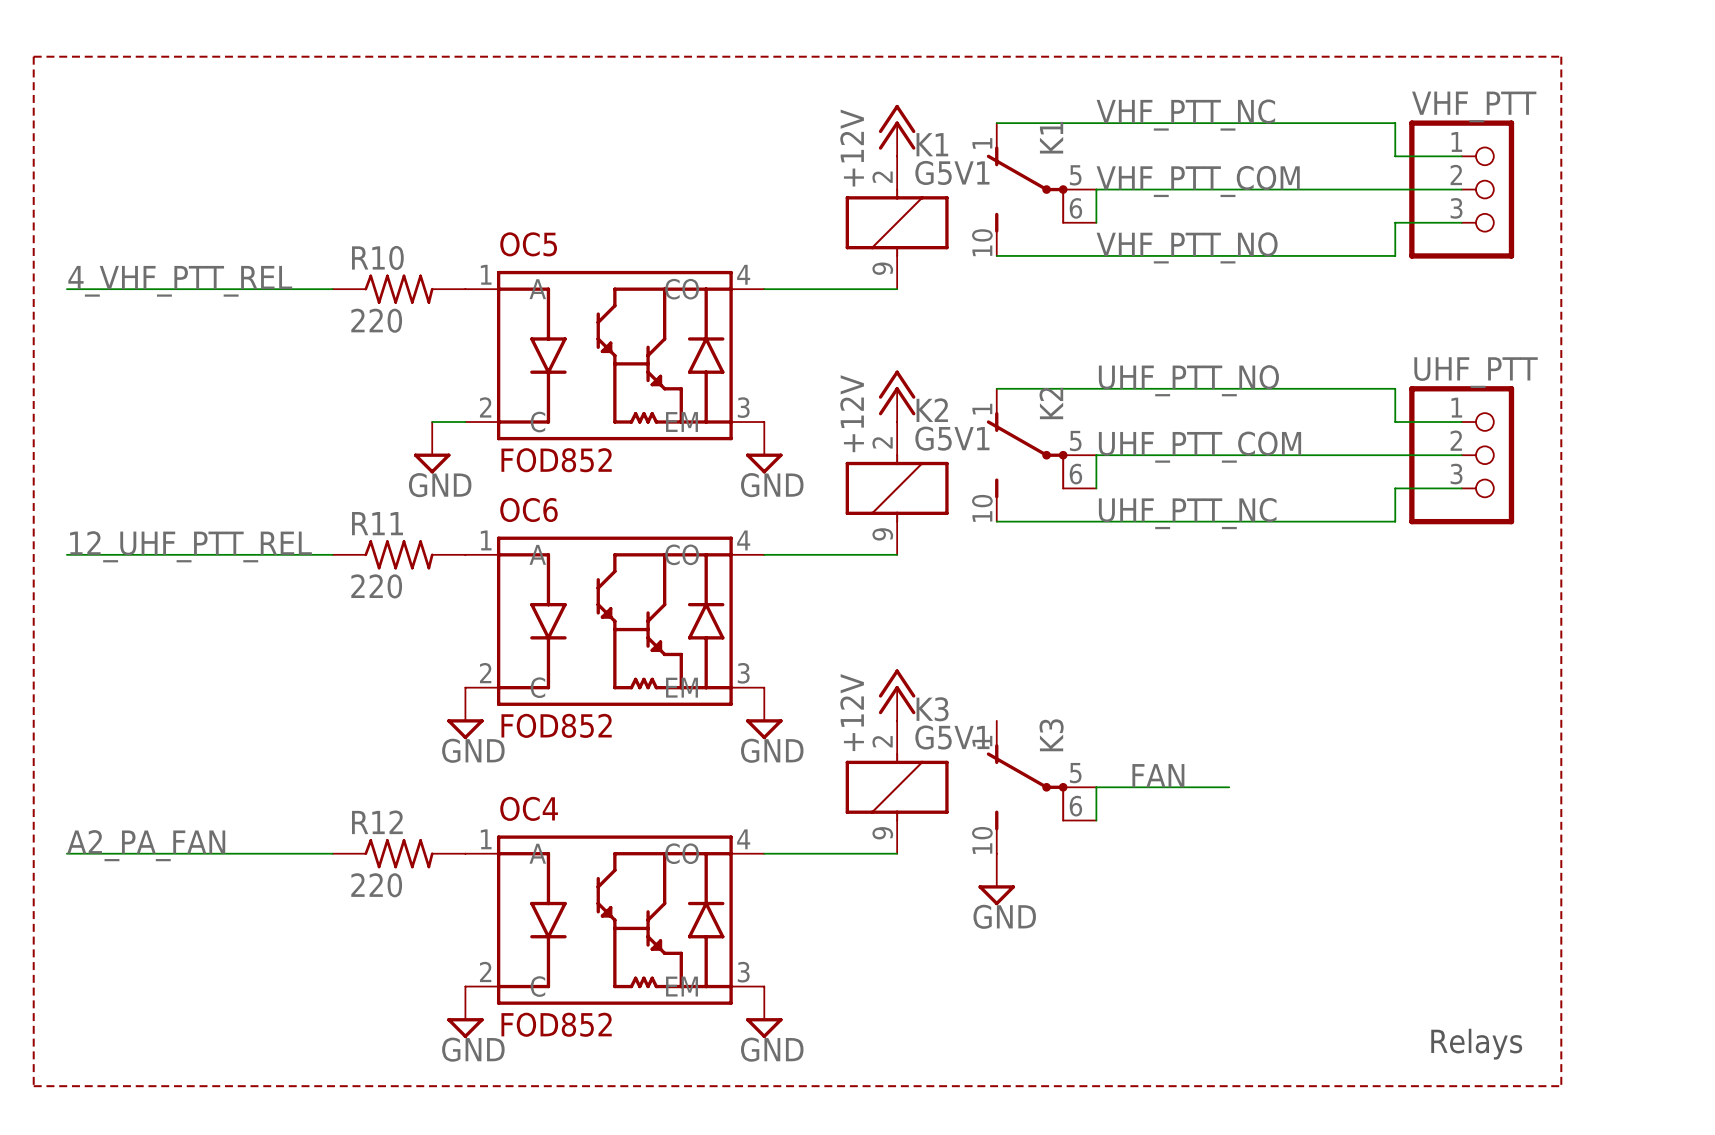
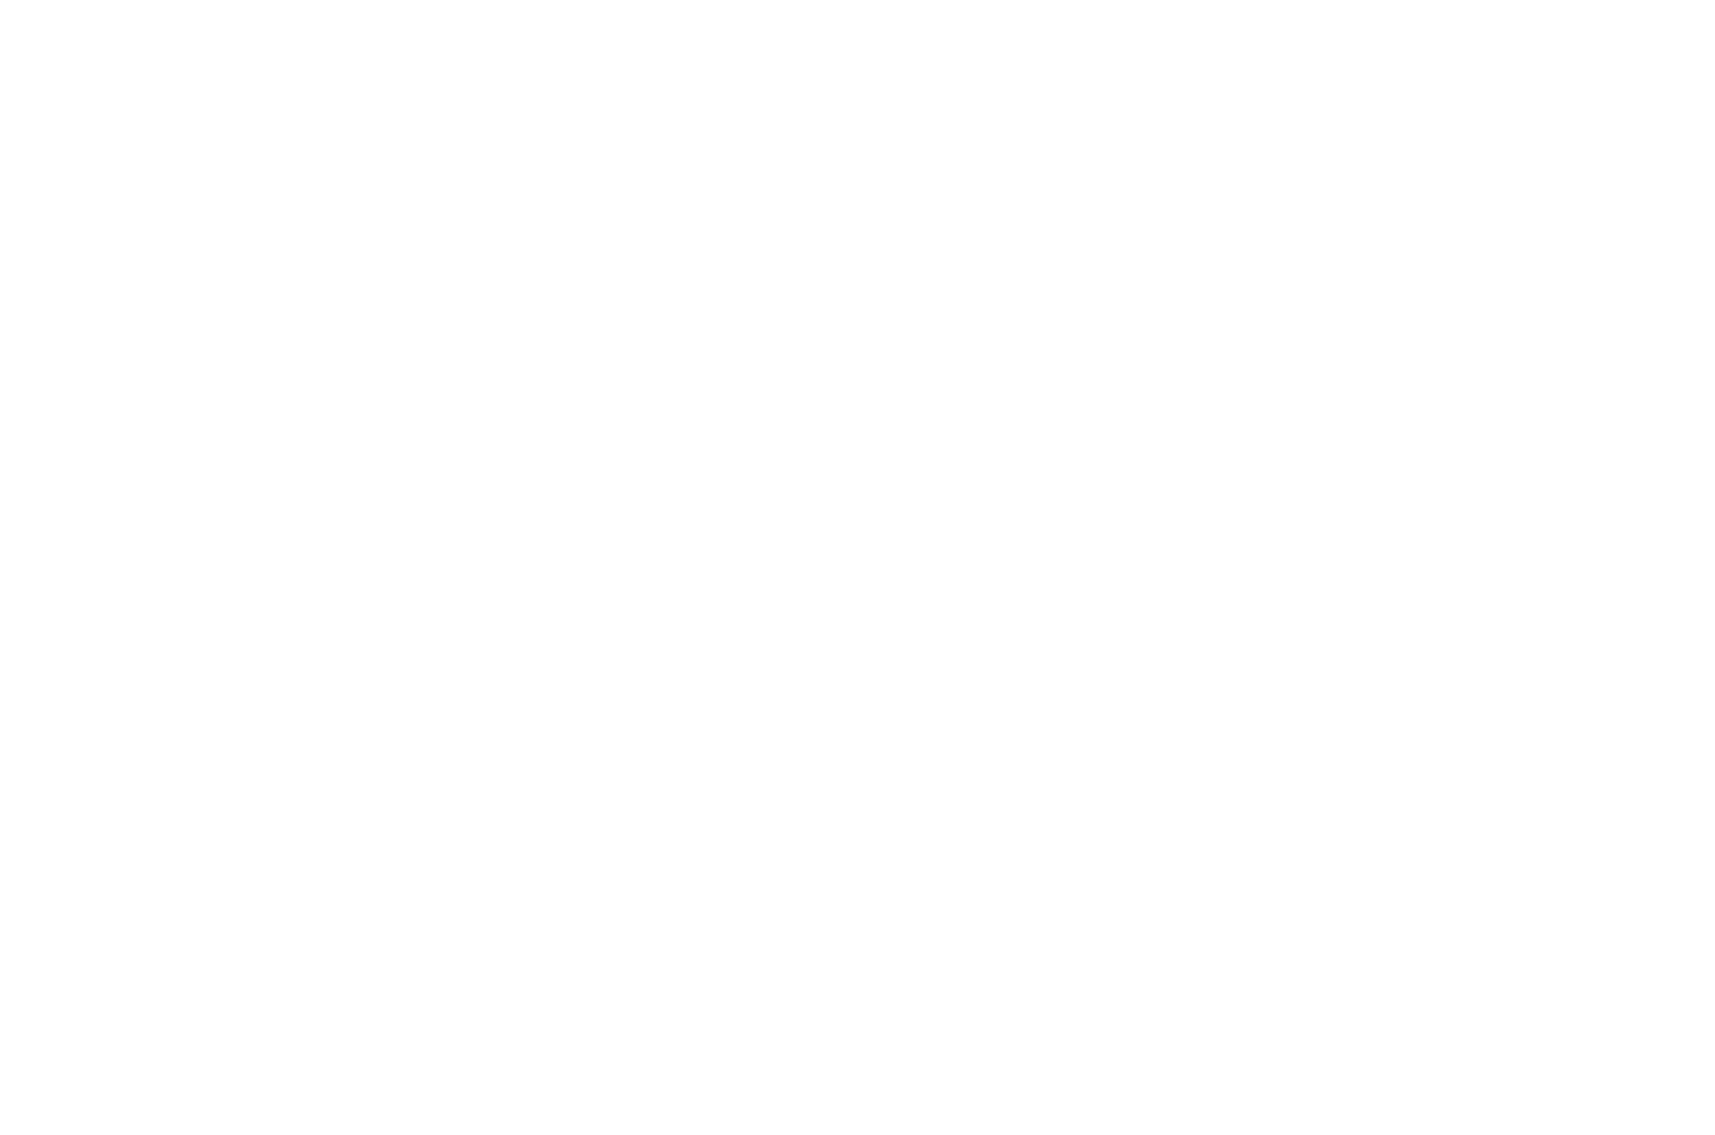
line: (33, 56) (33, 1086) (1561, 1086) (1561, 56) (33, 56) -> none
label: VHF_PTT_NC (1185, 115) -> none
wire: (996, 123) (1395, 123) (1395, 156) (1461, 156) -> none
power symbol: +12V (897, 130) -> none
label: VHF_PTT_COM (1198, 181) -> none
K1: (1041, 189) -> none
wire: (1461, 189) (1096, 189) (1096, 222) -> none
VHF_PTT: (1461, 189) -> none
K1: G5V1 (897, 222) -> none
wire: (1461, 222) (1395, 222) (1395, 255) (996, 255) -> none
label: VHF_PTT_NO (1187, 247) -> none
label: 4_VHF_PTT_REL (180, 281) -> none
wire: (66, 289) (332, 289) -> none
R10: 220 (399, 289) -> none
wire: (764, 289) (897, 289) -> none
OC5: FOD852 (614, 355) -> none
label: UHF_PTT_NO (1188, 380) -> none
wire: (996, 388) (1395, 388) (1395, 422) (1461, 422) -> none
power symbol: +12V (897, 396) -> none
wire: (432, 422) (465, 422) -> none
power symbol: GND (432, 447) -> none
power symbol: GND (764, 447) -> none
label: UHF_PTT_COM (1199, 447) -> none
K2: (1041, 455) -> none
wire: (1461, 455) (1096, 455) (1096, 488) -> none
UHF_PTT: (1461, 455) -> none
K2: G5V1 (897, 488) -> none
wire: (1461, 488) (1395, 488) (1395, 521) (996, 521) -> none
label: UHF_PTT_NC (1187, 513) -> none
label: 12_UHF_PTT_REL (190, 546) -> none
wire: (66, 554) (332, 554) -> none
R11: 220 (399, 554) -> none
wire: (764, 554) (897, 554) -> none
OC6: FOD852 (614, 621) -> none
power symbol: +12V (897, 695) -> none
power symbol: GND (465, 713) -> none
power symbol: GND (764, 713) -> none
label: FAN (1158, 775) -> none
K3: G5V1 (897, 787) -> none
K3: (1041, 787) -> none
wire: (1229, 787) (1096, 787) (1096, 820) -> none
label: A2_PA_FAN (146, 845) -> none
wire: (66, 853) (332, 853) -> none
R12: 220 (399, 853) -> none
wire: (764, 853) (897, 853) -> none
power symbol: GND (996, 879) -> none
OC4: FOD852 (614, 920) -> none
power symbol: GND (465, 1012) -> none
power symbol: GND (764, 1012) -> none
text: Relays (1476, 1044) -> none

